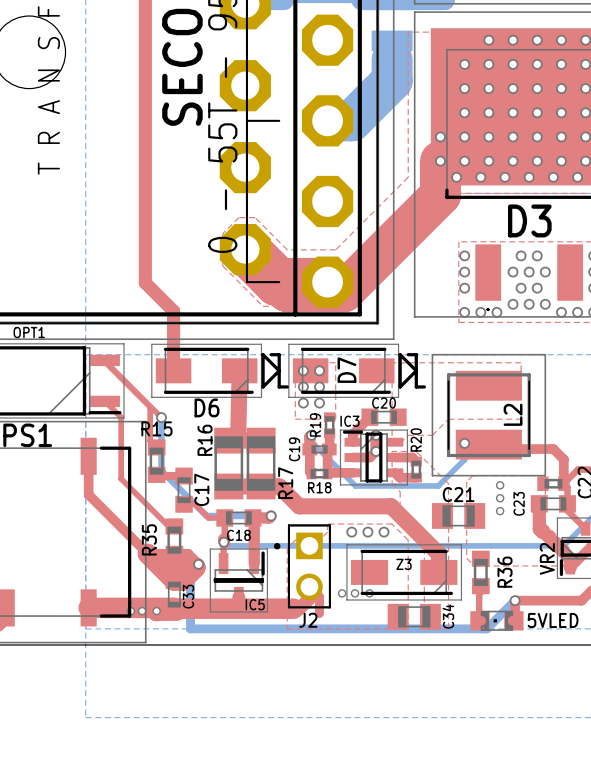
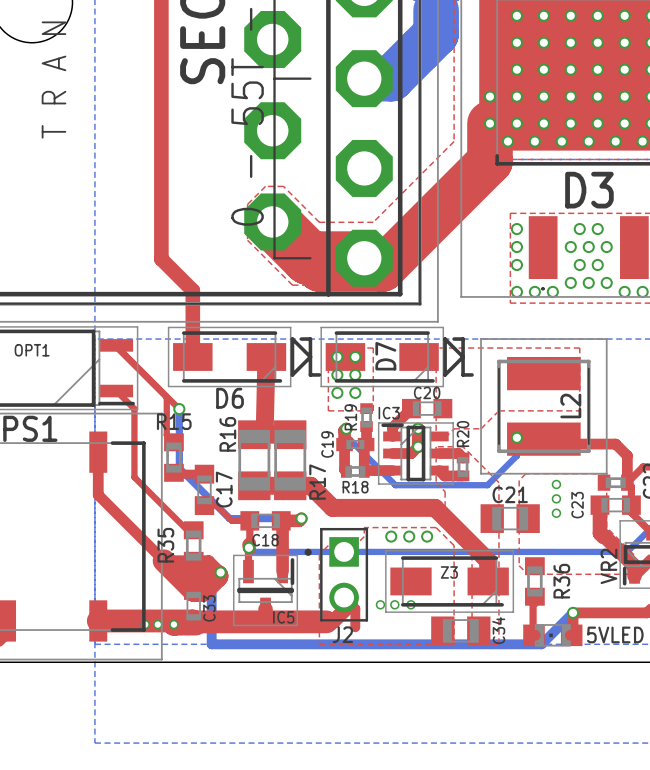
OPT1 name position: OPT1 (29, 332) -> OPT1 (32, 350)

